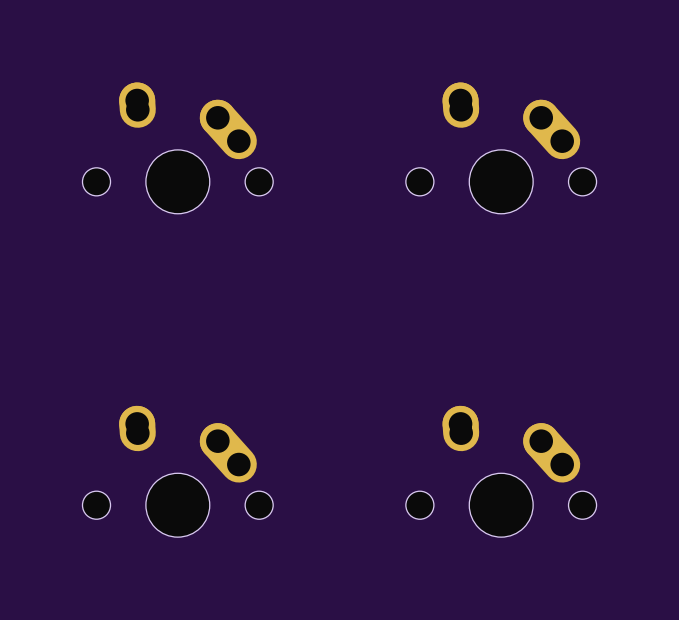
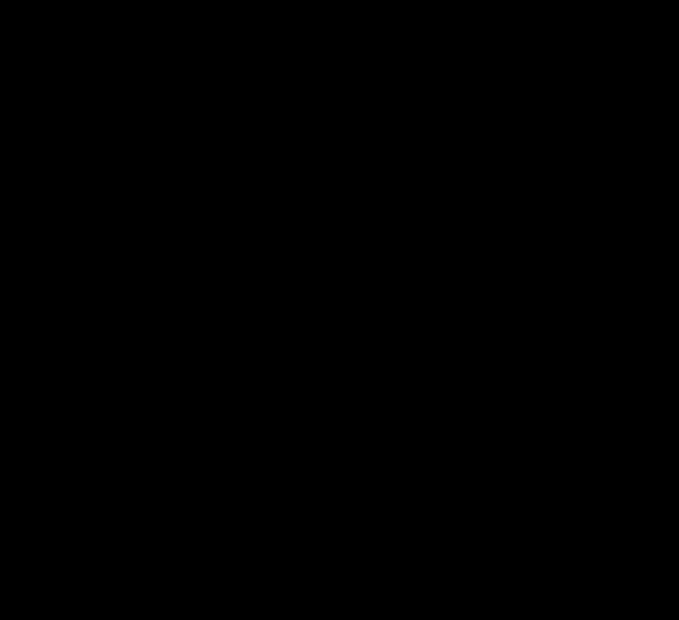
part: (177, 148) -> none
part: (501, 148) -> none
part: (177, 471) -> none
part: (501, 471) -> none

